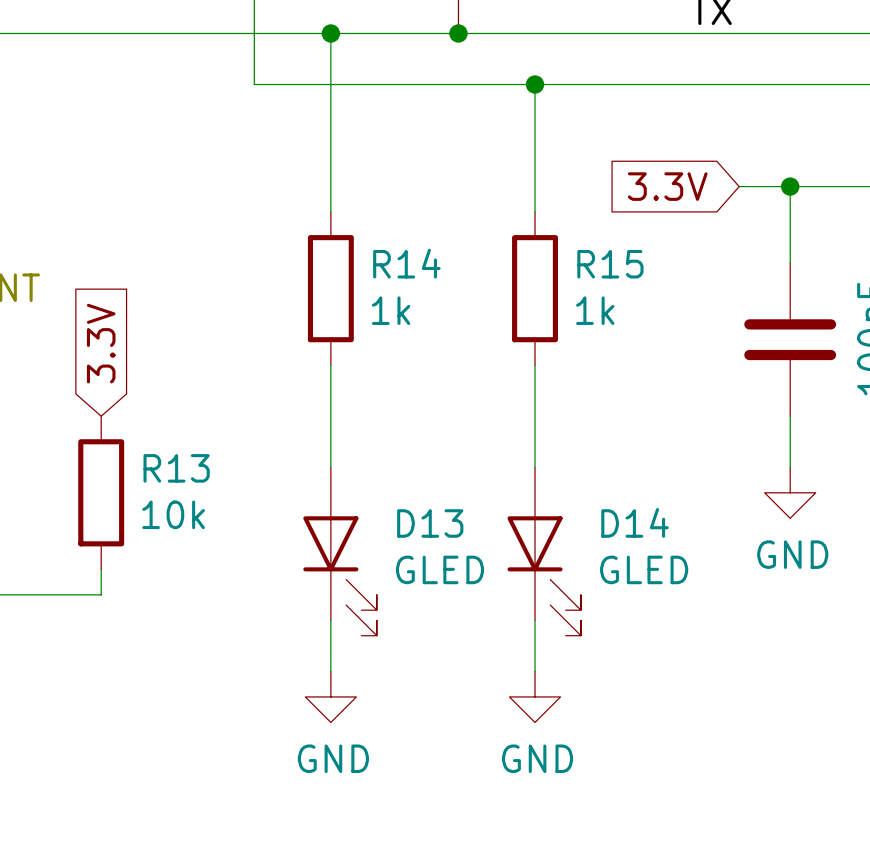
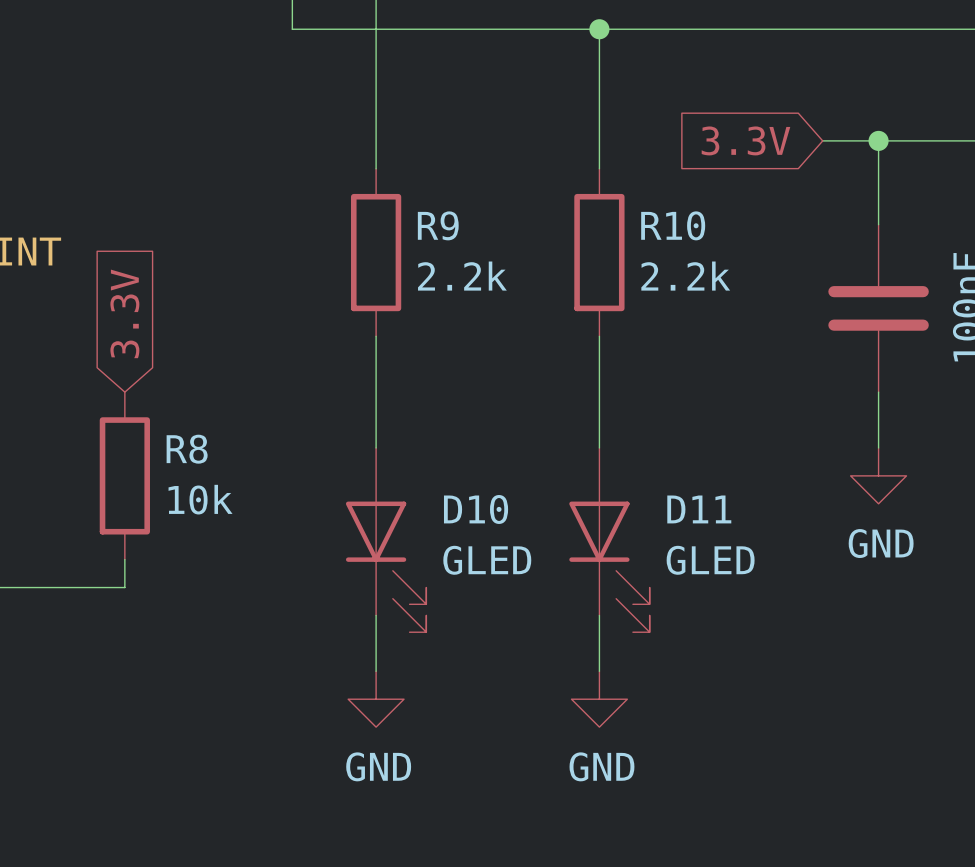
R14 name: R14 (406, 263) -> R9 (438, 225)
R15 name: R15 (610, 264) -> R10 (673, 225)
R14 value: 1k (391, 310) -> 2.2k (462, 276)
R15 value: 1k (595, 310) -> 2.2k (685, 276)
R13 name: R13 (176, 468) -> R8 (187, 449)
D14 name: D14 (635, 522) -> D11 (699, 509)
D13 name: D13 (430, 523) -> D10 (476, 509)

